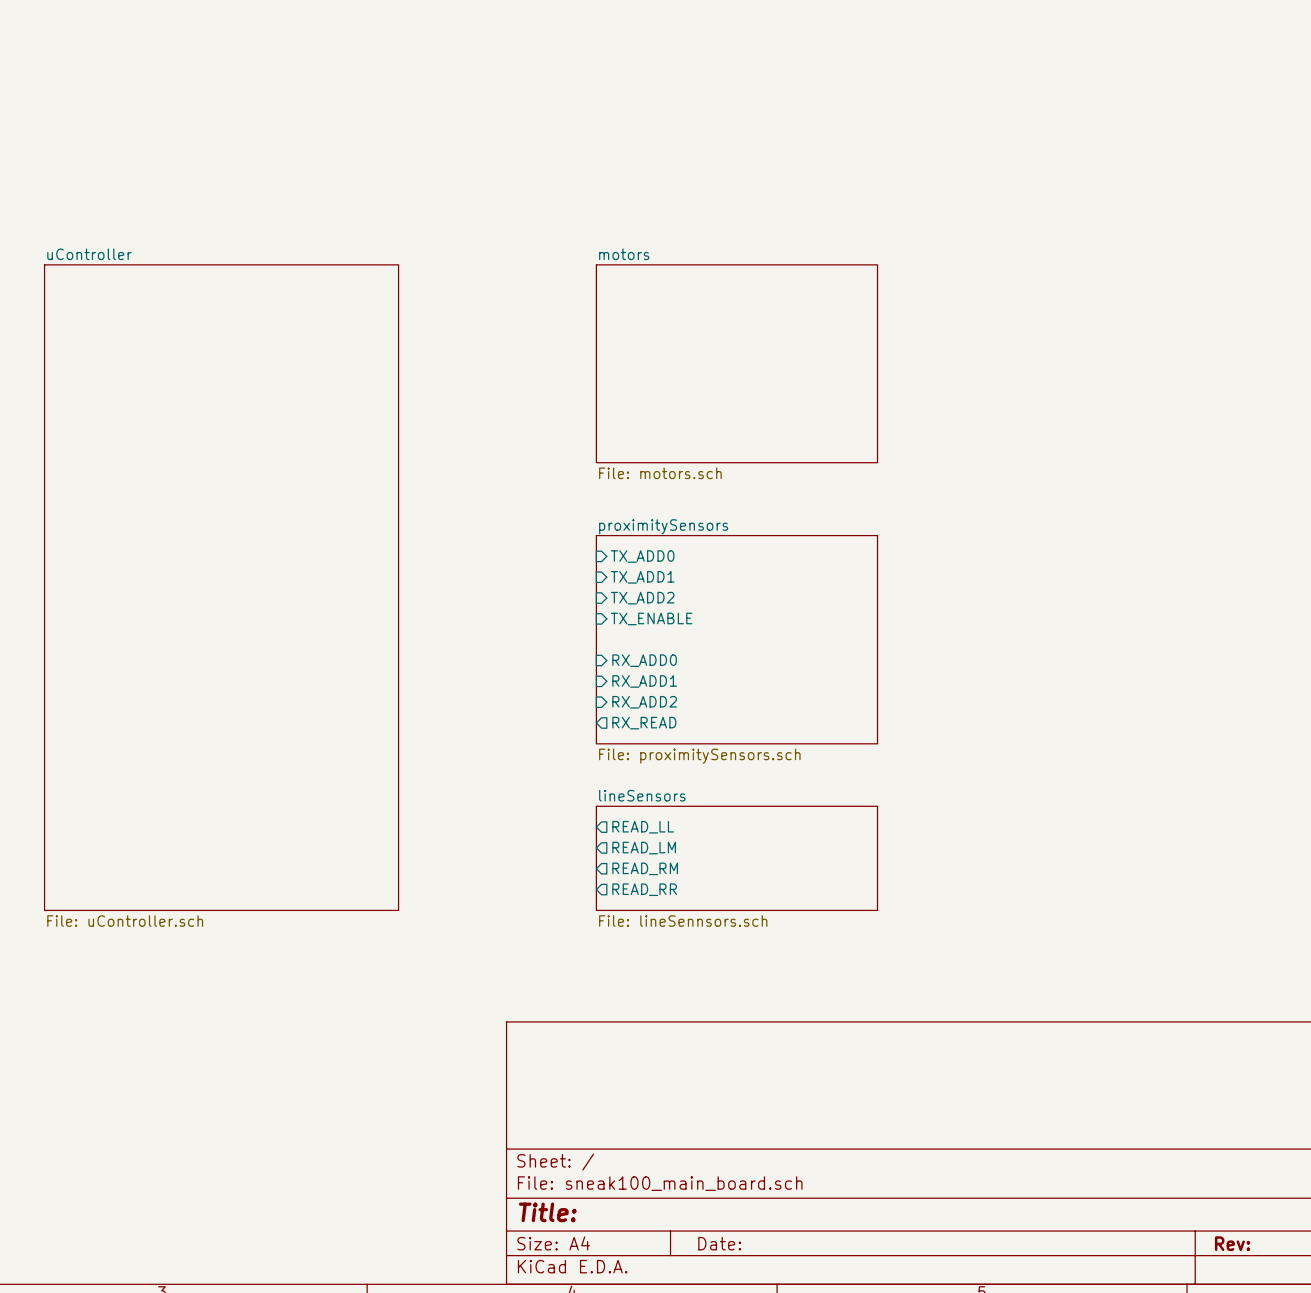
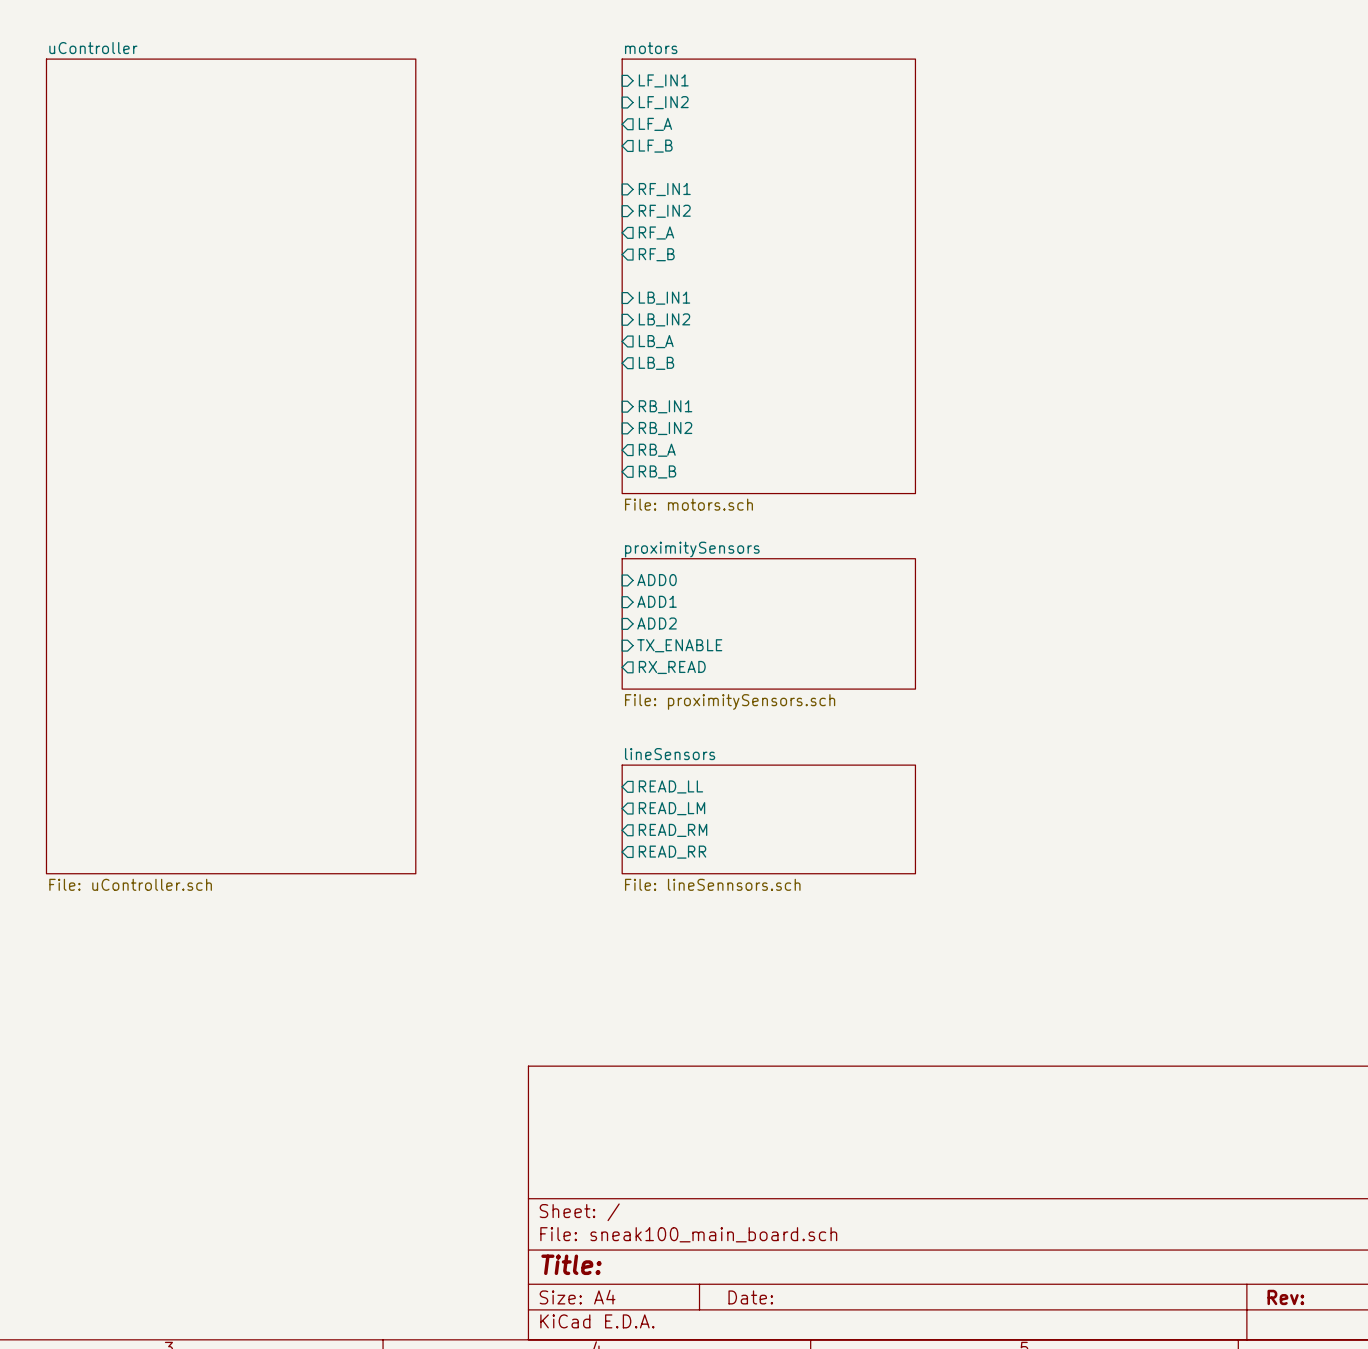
sheet pin: none -> LF_IN1 (663, 80)
sheet pin: none -> LF_IN2 (663, 102)
sheet pin: none -> LF_A (655, 124)
sheet pin: none -> LF_B (655, 146)
sheet pin: none -> RF_IN1 (664, 189)
sheet pin: none -> RF_IN2 (664, 211)
sheet pin: none -> RF_A (656, 232)
sheet pin: none -> RF_B (656, 254)
sheet motors: none -> File: motors.sch (768, 276)
sheet pin: none -> LB_IN1 (664, 298)
sheet pin: none -> LB_IN2 (664, 319)
sheet pin: none -> LB_A (656, 341)
sheet pin: none -> LB_B (656, 363)
sheet motors: File: motors.sch (736, 363) -> none
sheet pin: none -> RB_IN1 (665, 406)
sheet pin: none -> RB_IN2 (665, 428)
sheet pin: none -> RB_A (657, 450)
sheet uController: none -> File: uController.sch (231, 466)
sheet pin: none -> RB_B (657, 471)
sheet pin: TX_ADD0 (642, 556) -> ADD0 (656, 580)
sheet pin: TX_ADD1 (642, 577) -> ADD1 (656, 601)
sheet uController: File: uController.sch (221, 587) -> none
sheet pin: TX_ADD2 (642, 598) -> ADD2 (656, 623)
sheet proximitySensors: none -> File: proximitySensors.sch (768, 623)
sheet proximitySensors: File: proximitySensors.sch (736, 639) -> none
sheet pin: RX_ADD0 (644, 660) -> none
sheet pin: RX_ADD1 (644, 681) -> none
sheet pin: RX_ADD2 (644, 702) -> none
sheet pin position: RX_READ (644, 723) -> RX_READ (672, 667)
sheet pin position: READ_LL (643, 827) -> READ_LL (670, 786)
sheet pin position: READ_LM (644, 848) -> READ_LM (671, 808)
sheet lineSensors position: (736, 858) -> (768, 819)
sheet pin position: READ_RM (645, 868) -> READ_RM (673, 830)
sheet pin position: READ_RR (644, 889) -> READ_RR (672, 852)

